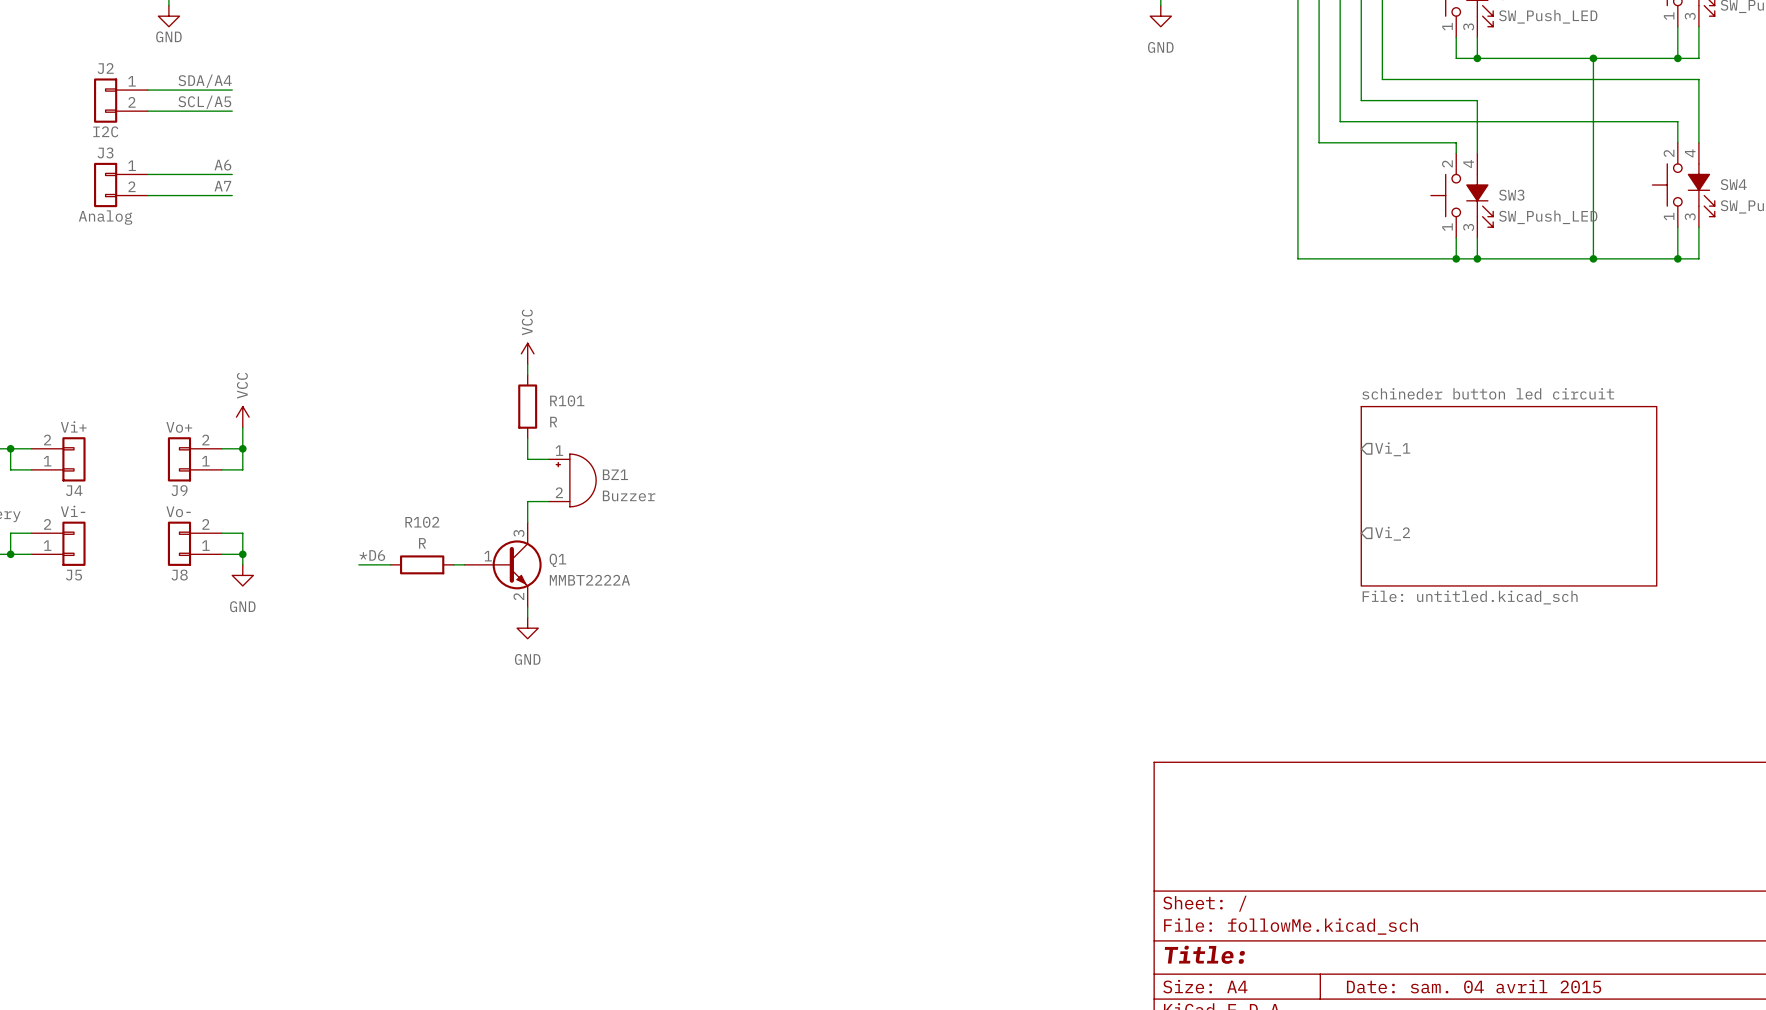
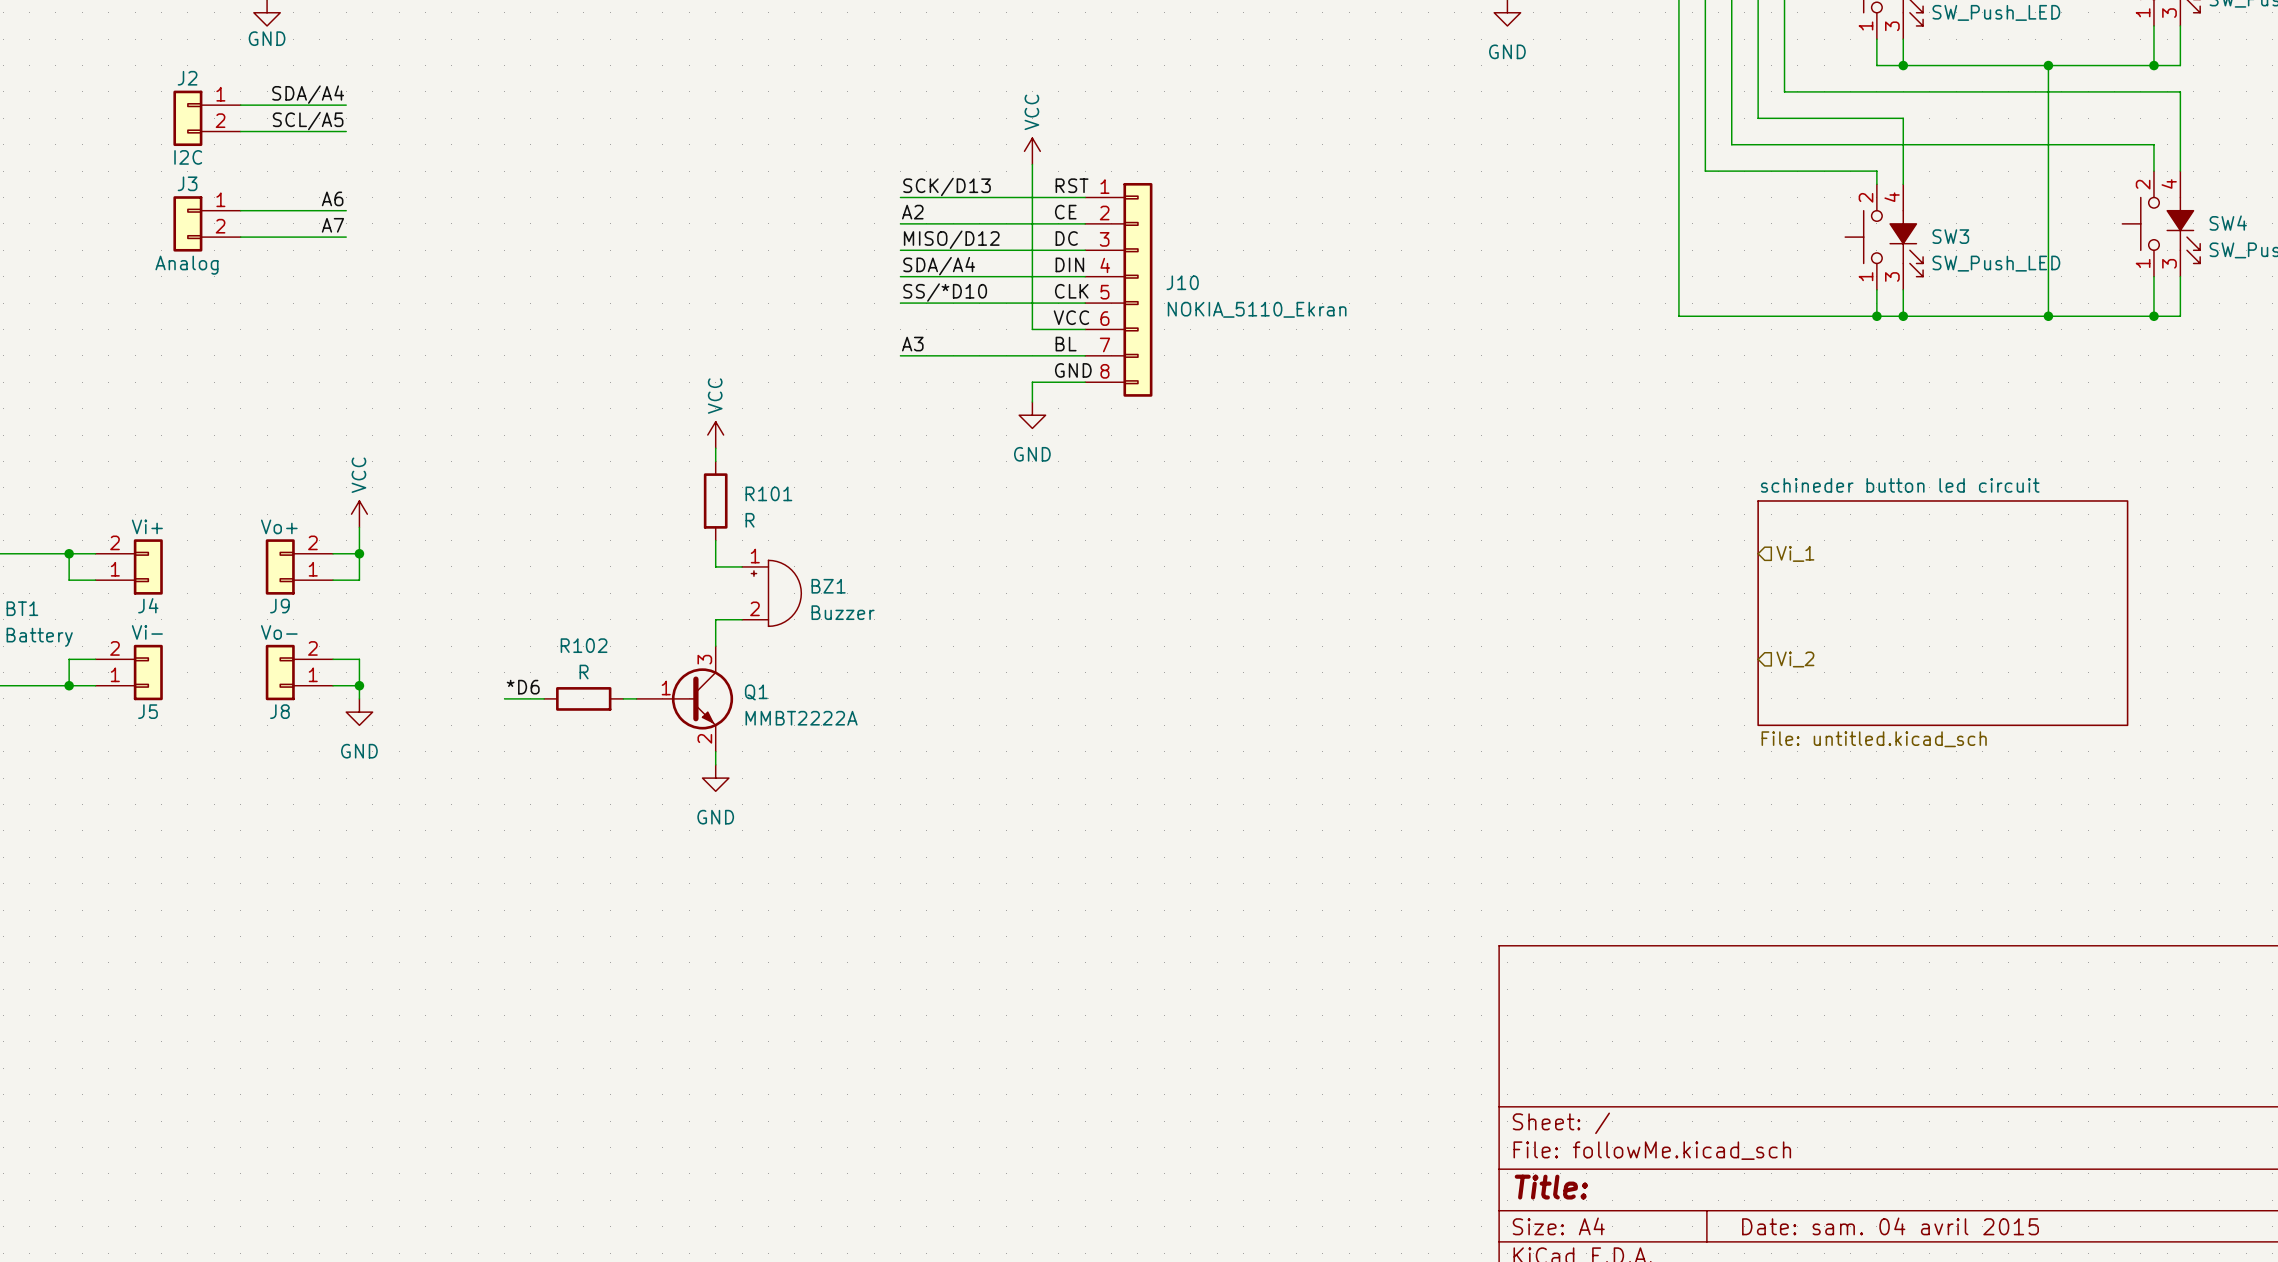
power symbol: none -> VCC (1032, 151)
wire: none -> (1032, 164) (1032, 329) (1085, 329)
label: none -> RST (1072, 185)
label: none -> SCK/D13 (947, 186)
wire: none -> (900, 197) (1085, 197)
label: none -> A2 (912, 212)
label: none -> CE (1065, 212)
wire: none -> (900, 223) (1085, 223)
label: none -> DC (1066, 238)
label: none -> MISO/D12 (951, 239)
wire: none -> (900, 250) (1085, 250)
label: none -> DIN (1069, 264)
label: none -> SDA/A4 (939, 266)
wire: none -> (900, 276) (1085, 276)
J10: none -> NOKIA_5110_Ekran (1118, 289)
label: none -> CLK (1071, 291)
label: none -> SS/*D10 (945, 292)
wire: none -> (900, 303) (1085, 303)
label: none -> VCC (1071, 317)
label: none -> A3 (912, 344)
label: none -> BL (1066, 344)
wire: none -> (900, 355) (1085, 355)
label: none -> GND (1073, 370)
wire: none -> (1085, 382) (1032, 382) (1032, 402)
power symbol: none -> GND (1032, 415)

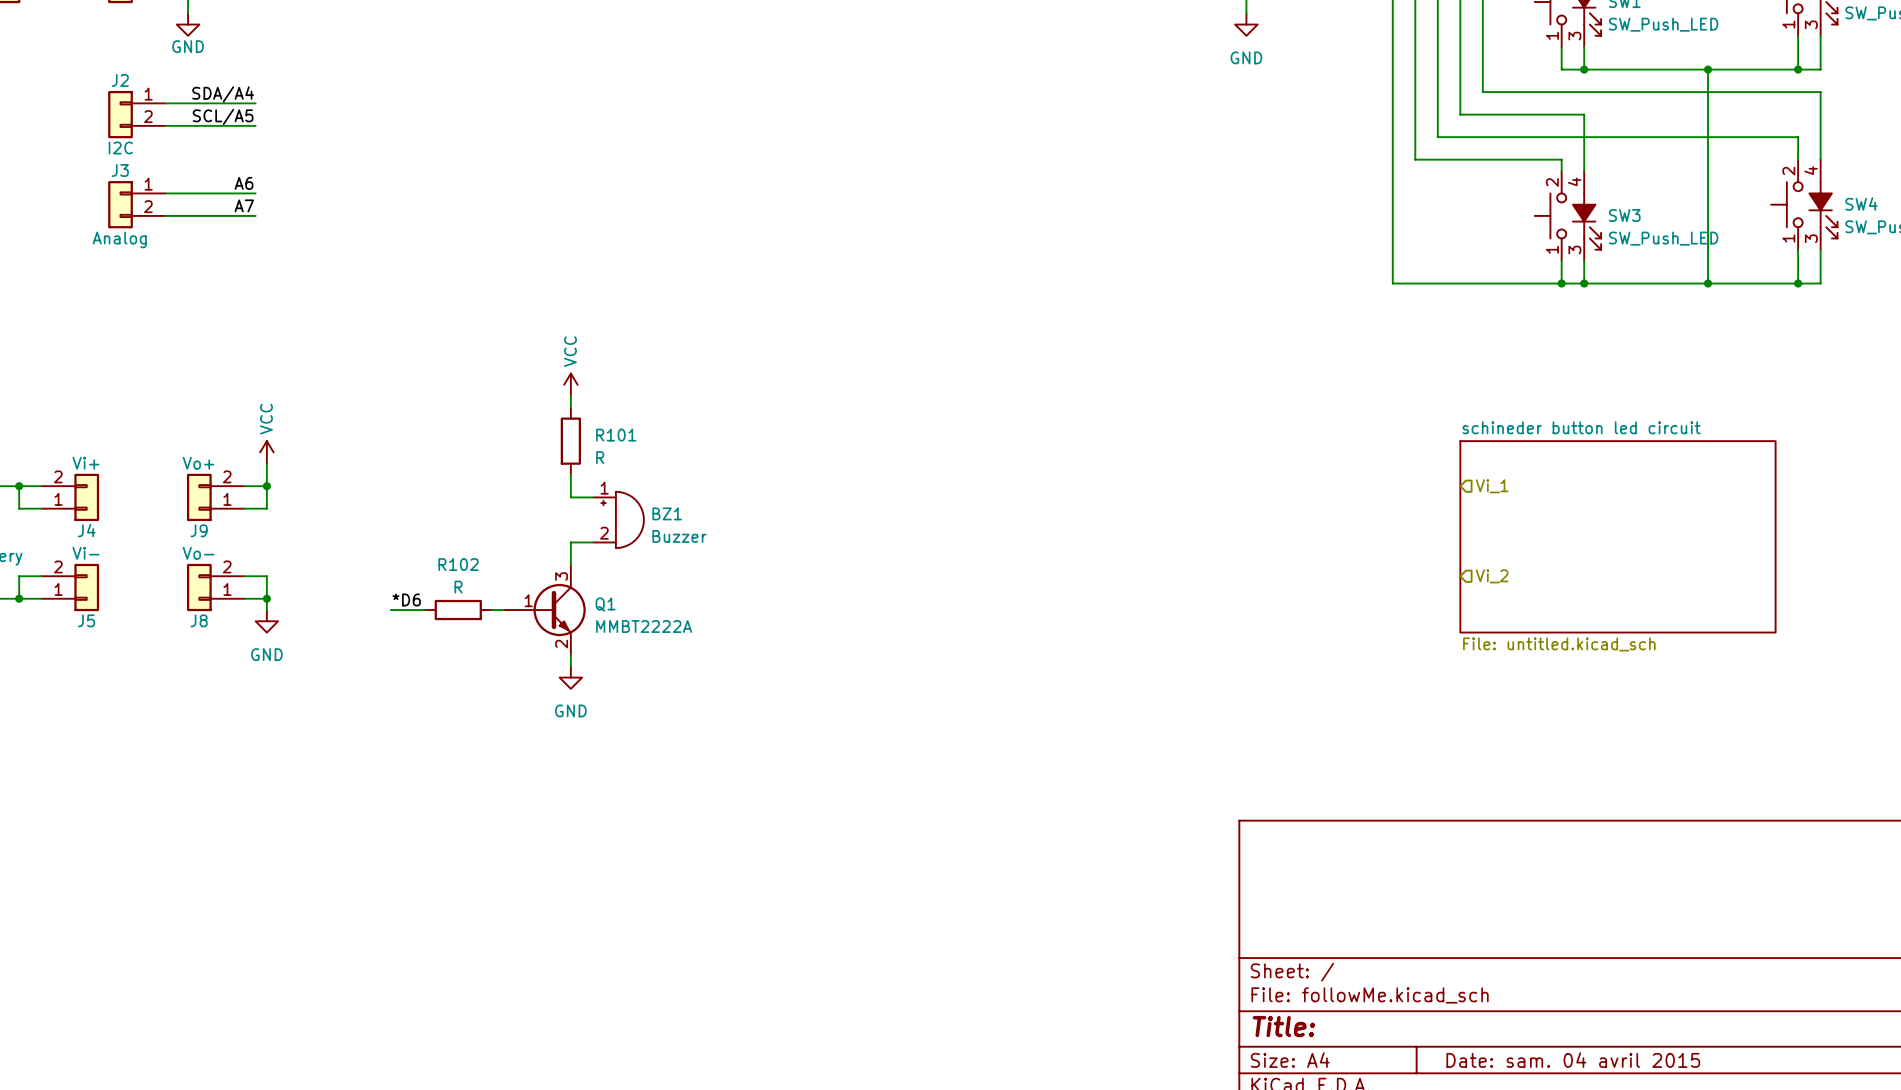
power symbol: VCC (1032, 151) -> none
wire: (1032, 164) (1032, 329) (1085, 329) -> none
label: RST (1072, 185) -> none
label: SCK/D13 (947, 186) -> none
wire: (900, 197) (1085, 197) -> none
label: A2 (912, 212) -> none
label: CE (1065, 212) -> none
wire: (900, 223) (1085, 223) -> none
label: DC (1066, 238) -> none
label: MISO/D12 (951, 239) -> none
wire: (900, 250) (1085, 250) -> none
label: DIN (1069, 264) -> none
label: SDA/A4 (939, 266) -> none
wire: (900, 276) (1085, 276) -> none
J10: NOKIA_5110_Ekran (1118, 289) -> none
label: CLK (1071, 291) -> none
label: SS/*D10 (945, 292) -> none
wire: (900, 303) (1085, 303) -> none
label: VCC (1071, 317) -> none
label: A3 (912, 344) -> none
label: BL (1066, 344) -> none
wire: (900, 355) (1085, 355) -> none
label: GND (1073, 370) -> none
wire: (1085, 382) (1032, 382) (1032, 402) -> none
power symbol: GND (1032, 415) -> none

